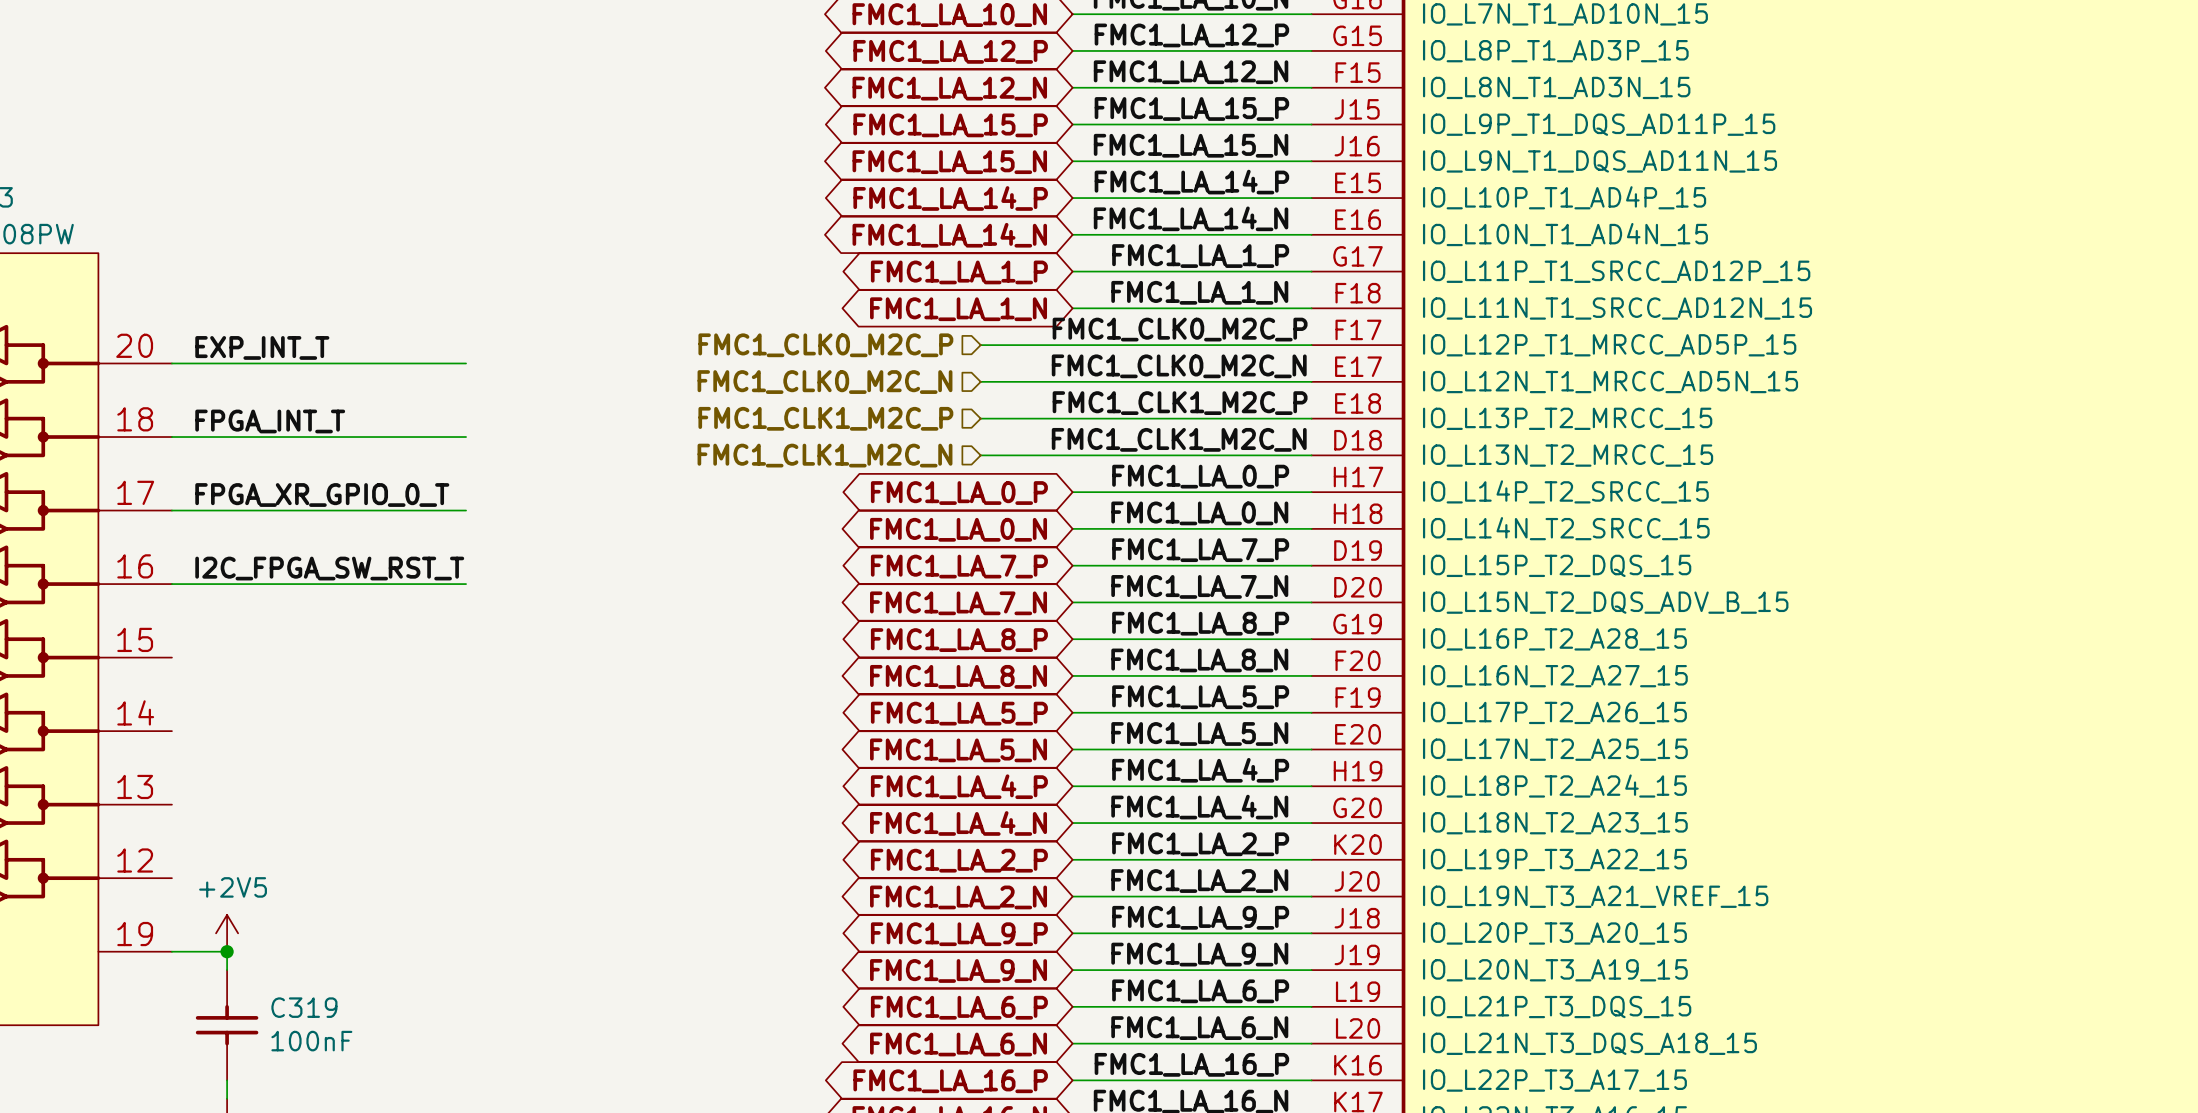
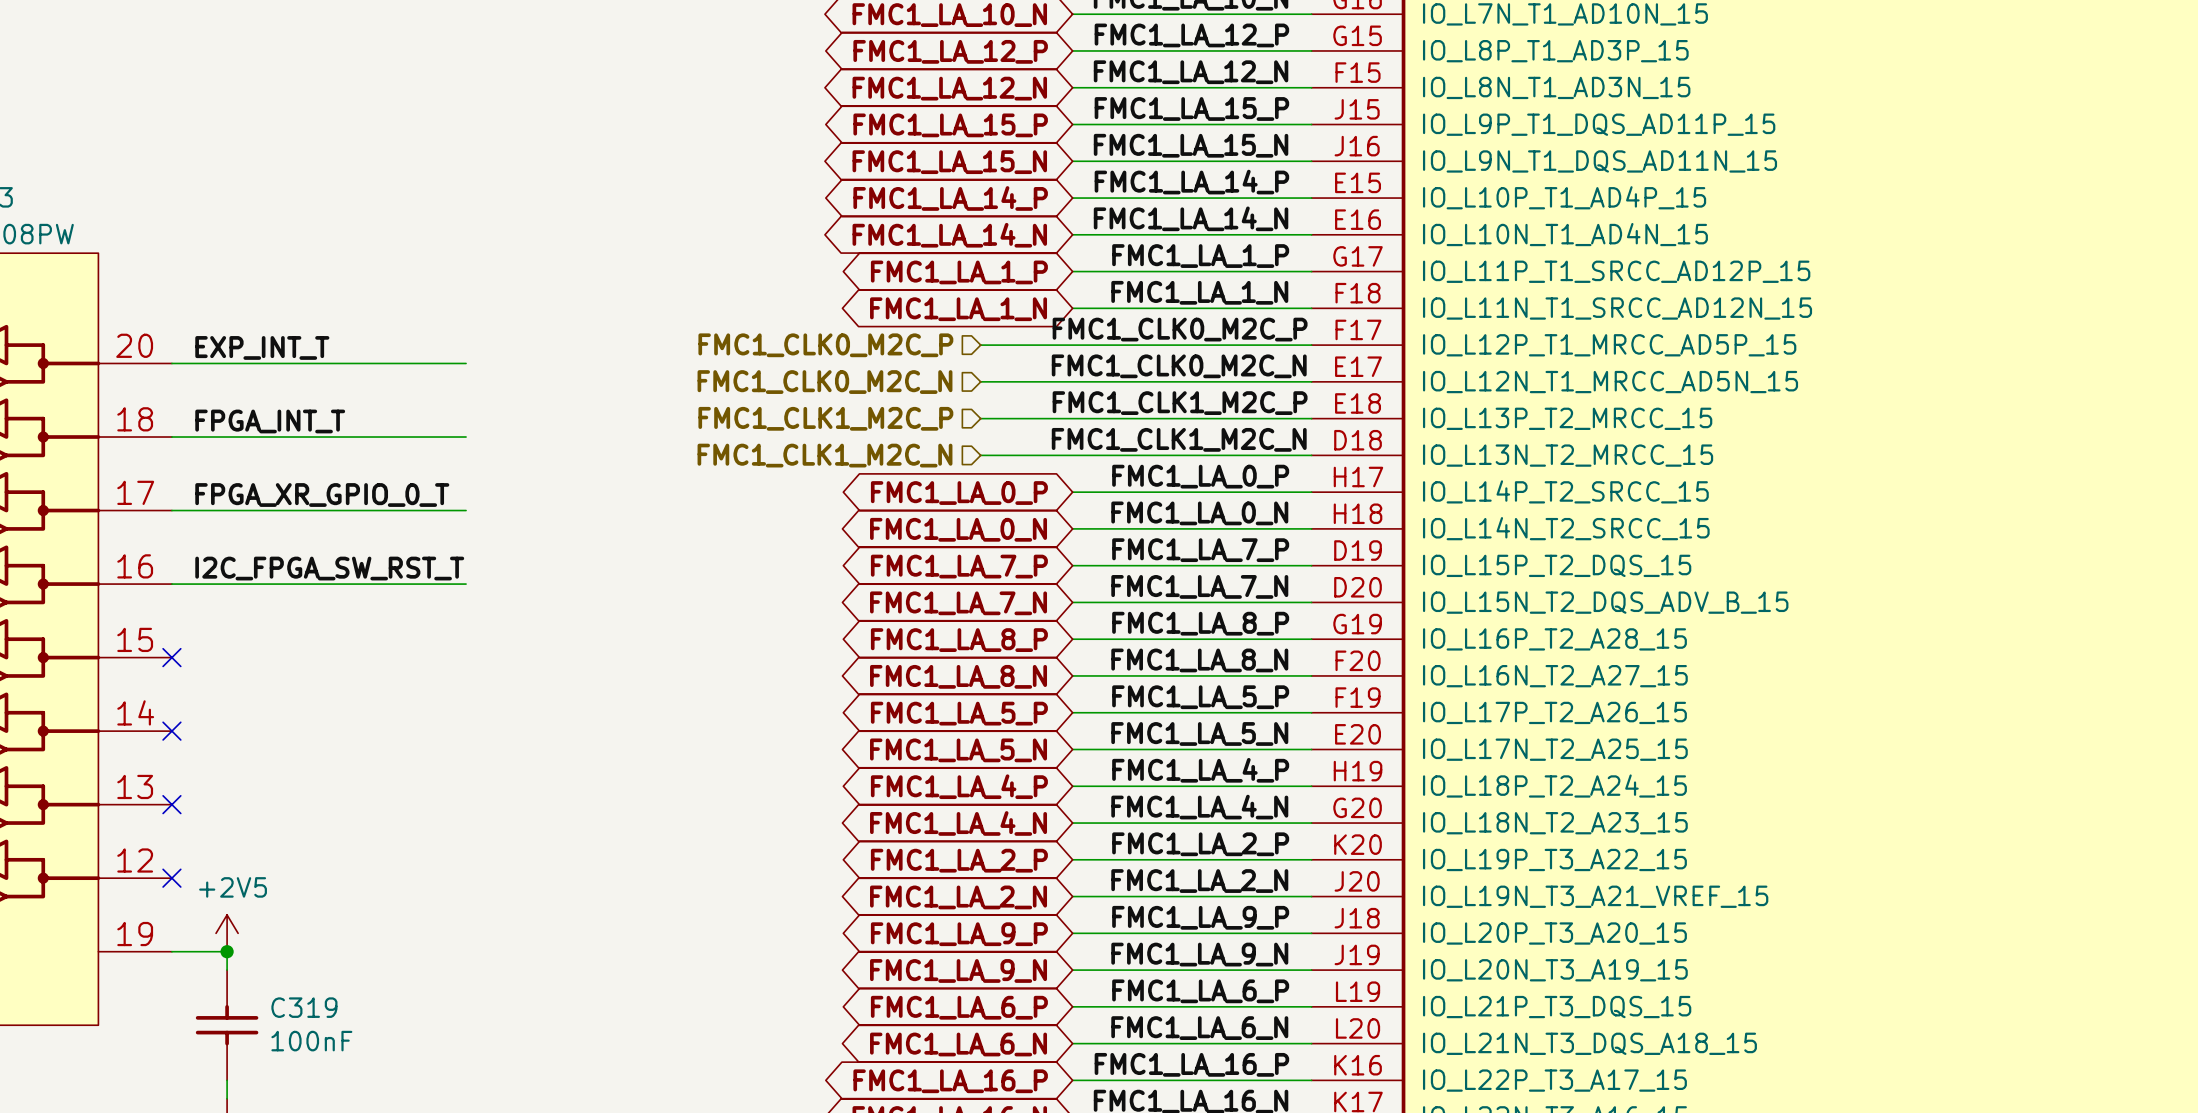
no-connect mark: none -> (171, 657)
no-connect mark: none -> (171, 731)
no-connect mark: none -> (171, 804)
no-connect mark: none -> (171, 878)

